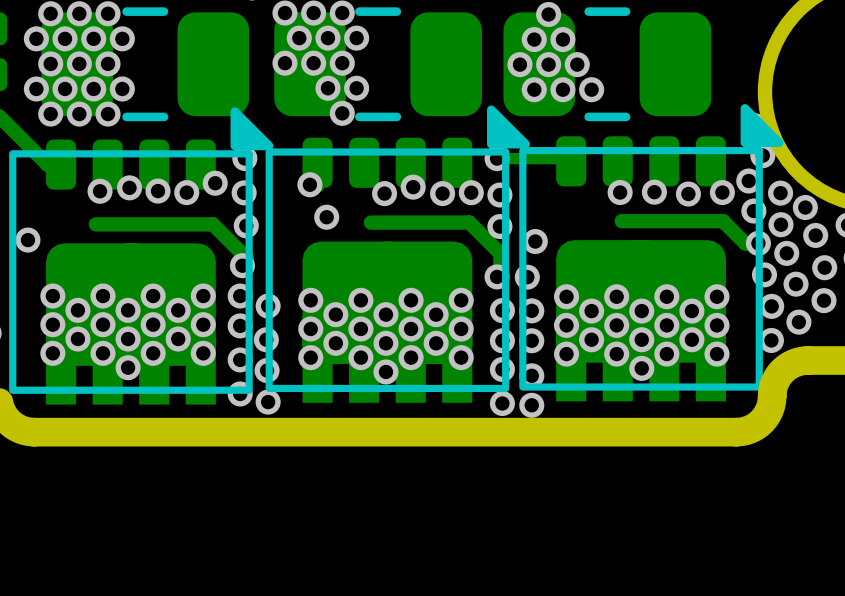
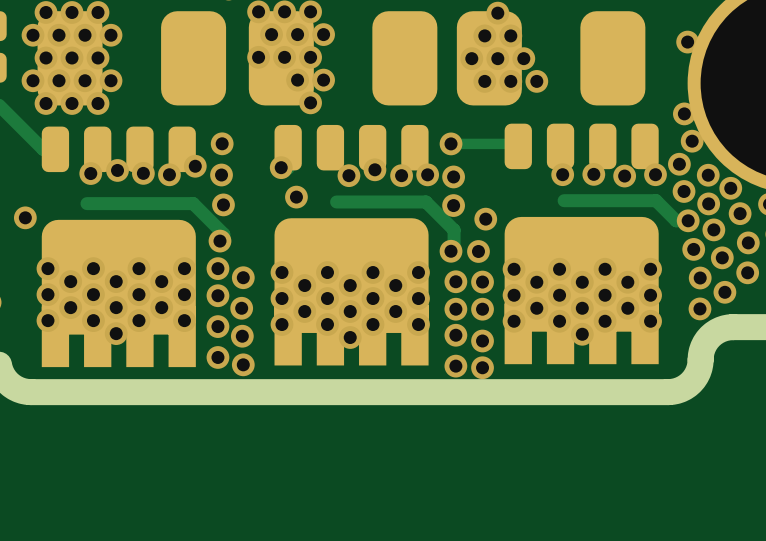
part footprint: [41, 7, 250, 122] -> [37, 11, 227, 106]
part footprint: [274, 7, 482, 122] -> [248, 11, 438, 106]
part footprint: [503, 7, 712, 122] -> [456, 11, 646, 106]
via: none -> (687, 42)
part footprint: [519, 104, 784, 402] -> [504, 123, 659, 365]
part footprint: [265, 105, 530, 403] -> [274, 124, 429, 366]
part footprint: [9, 107, 274, 405] -> [41, 126, 196, 368]

